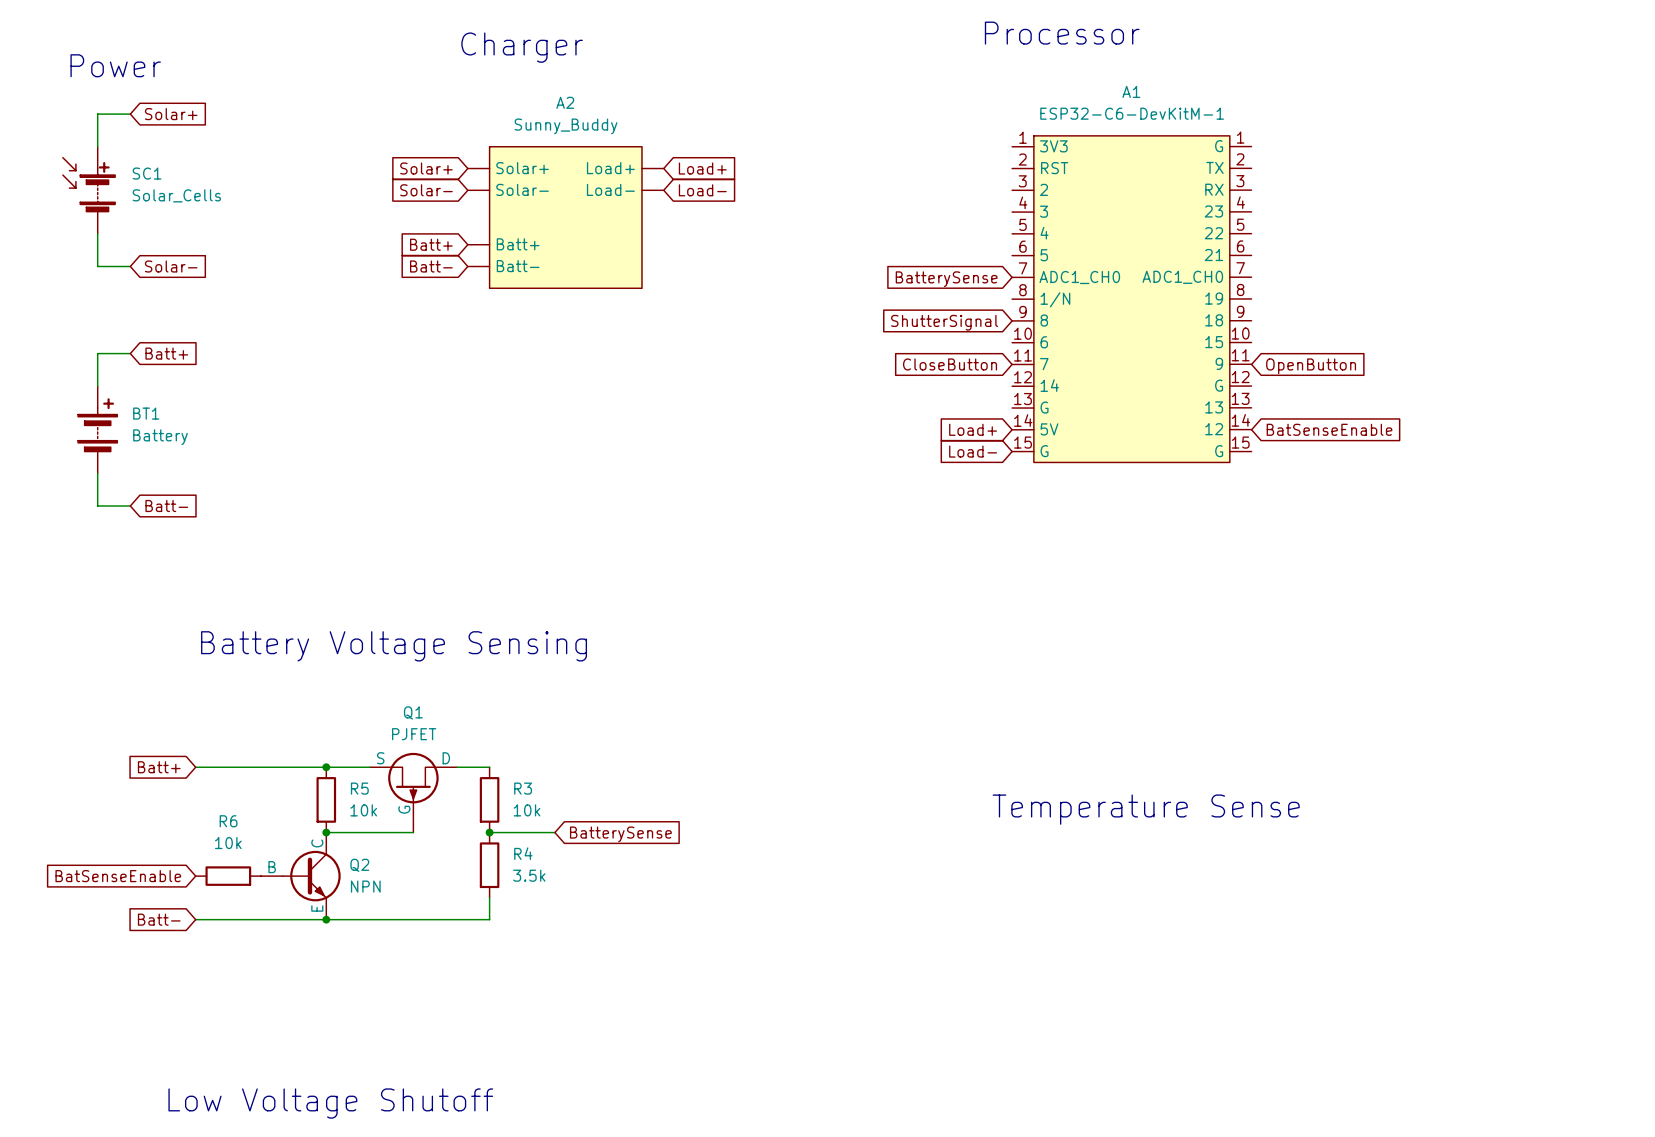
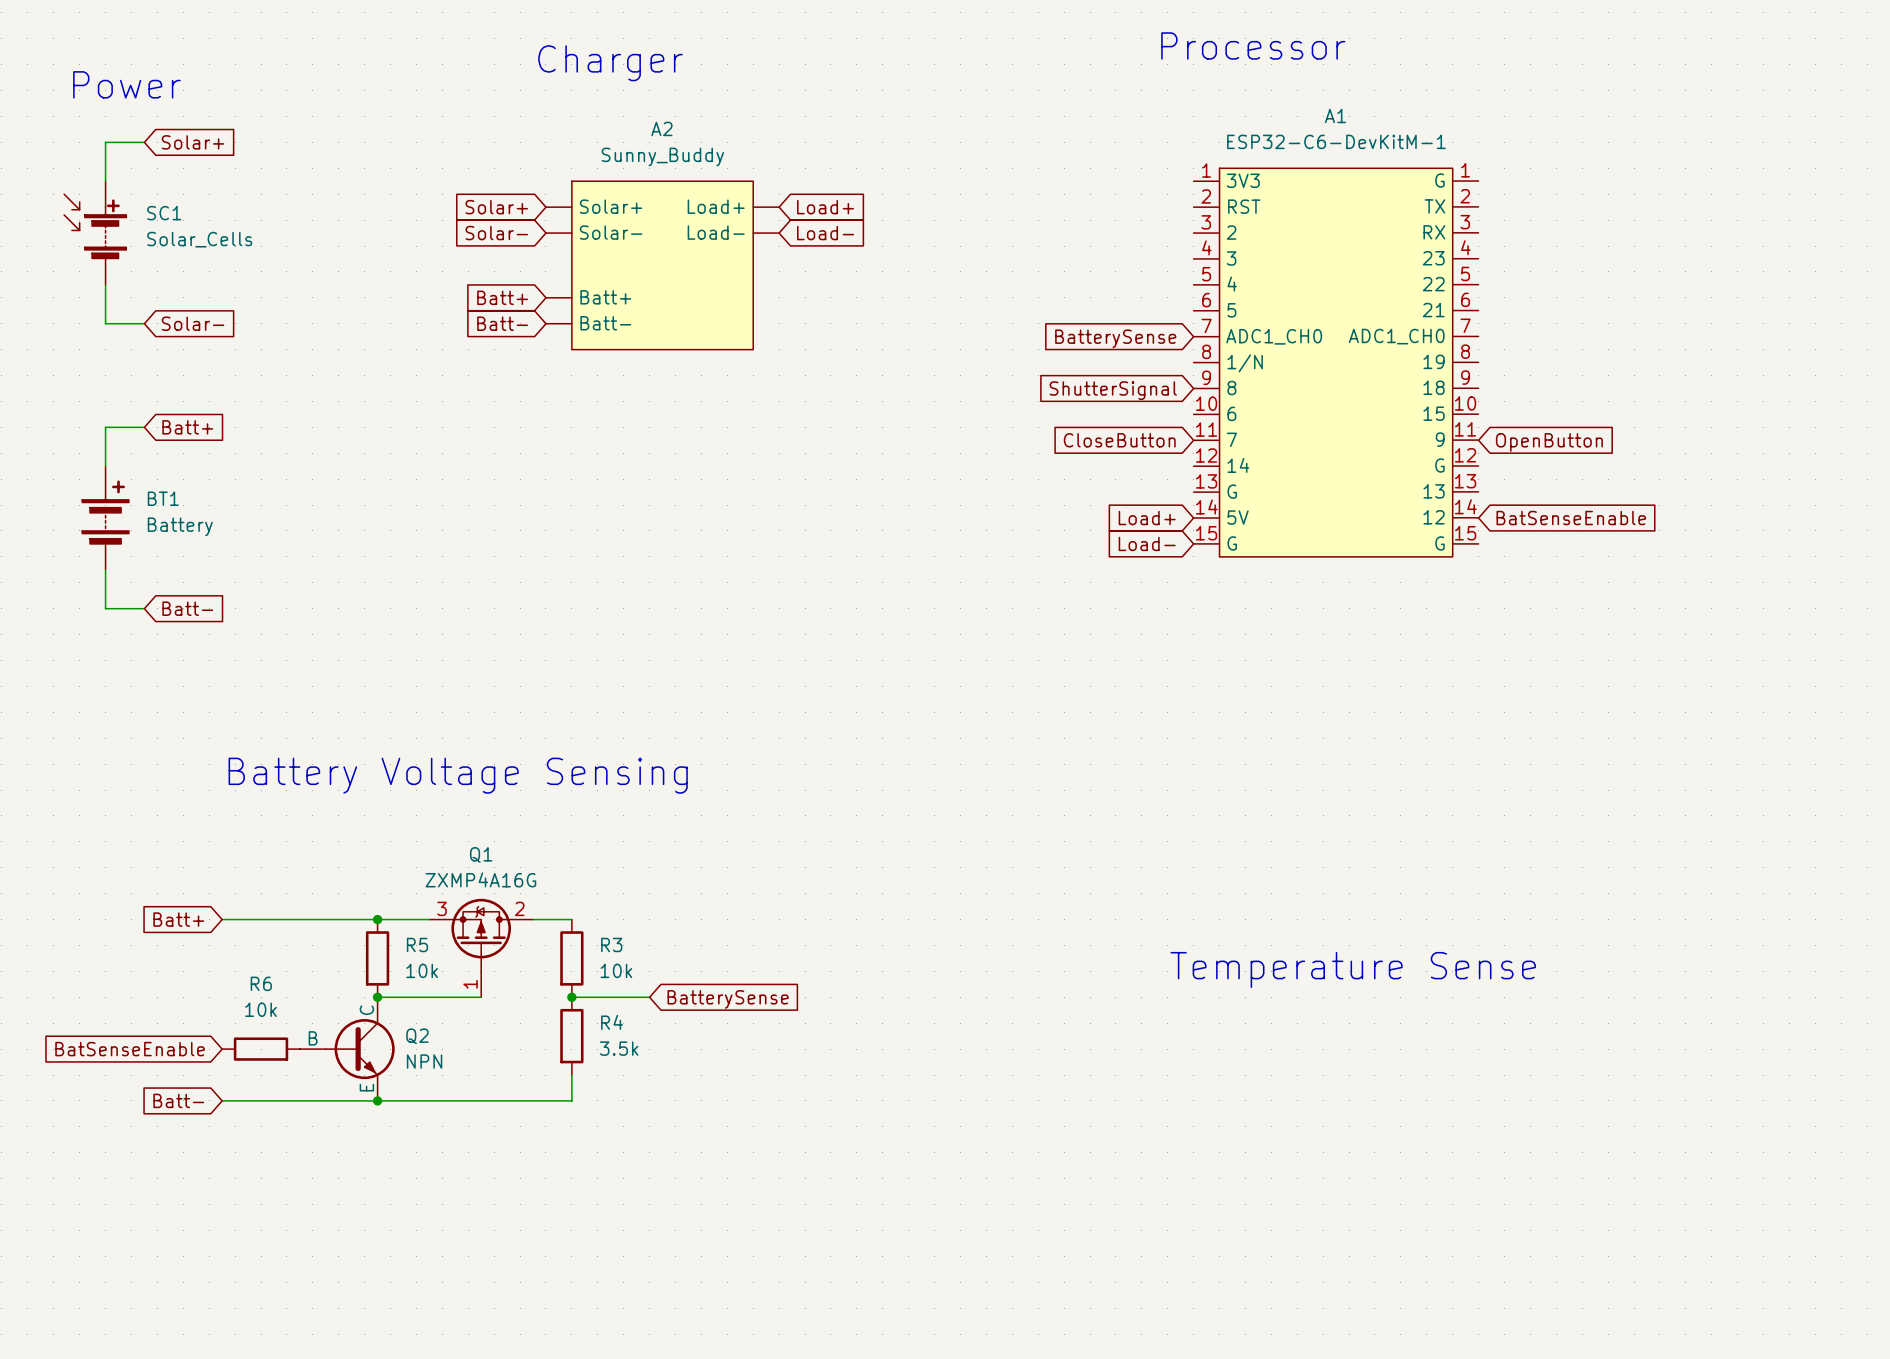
Q1 value: PJFET (414, 734) -> ZXMP4A16G (480, 879)
Q1 symbol: [369, 752, 457, 833] -> [429, 898, 534, 998]
text: Low Voltage Shutoff (330, 1103) -> none

